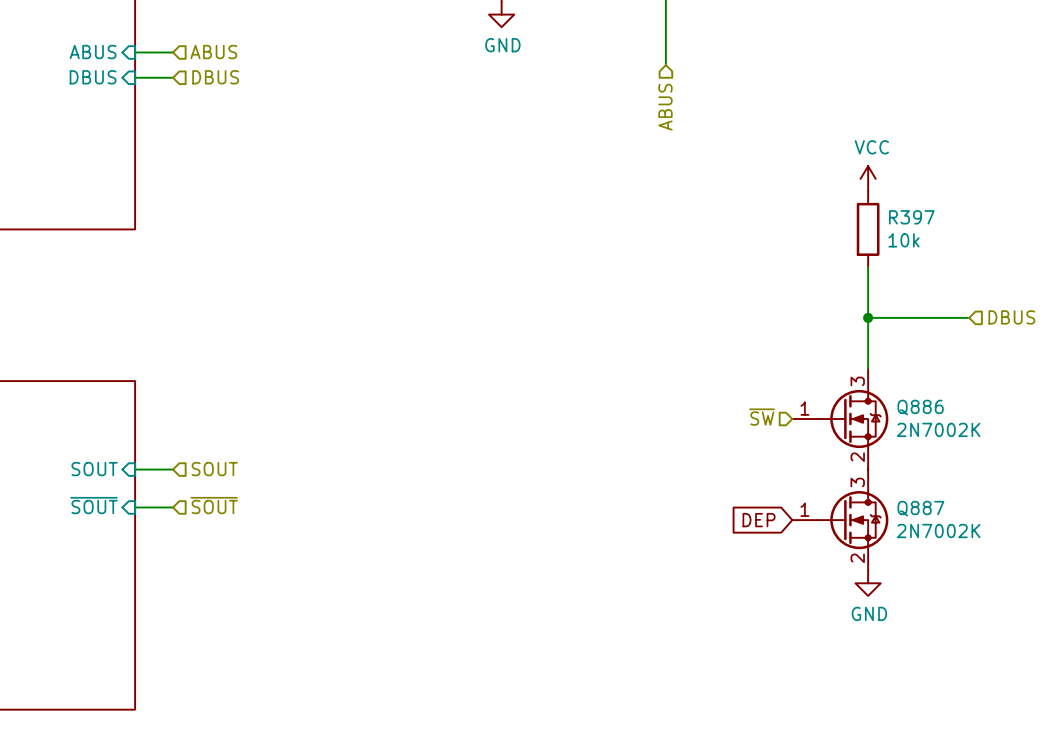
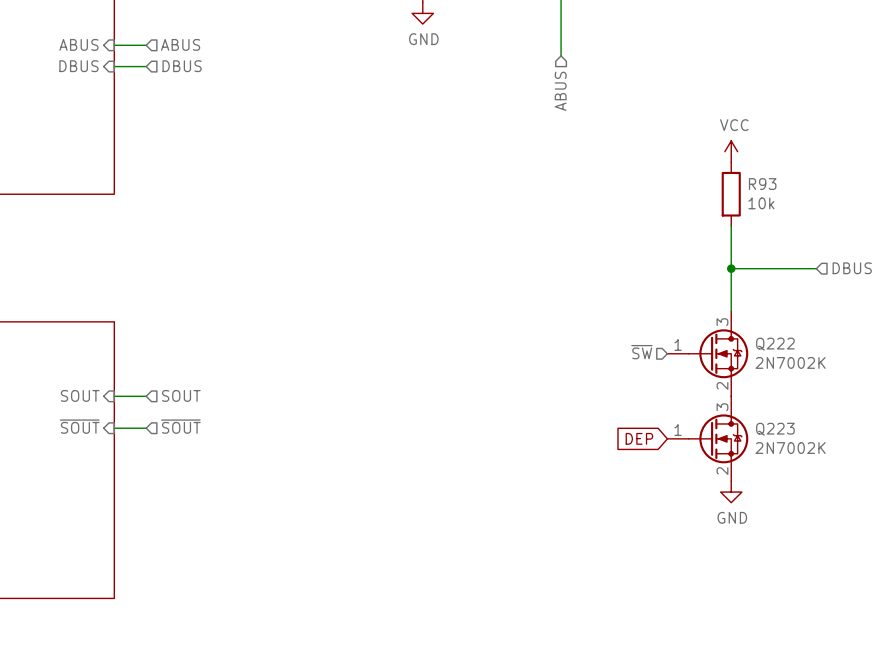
R397 name: R397 (911, 217) -> R93 (762, 184)
Q886 name: Q886 (920, 407) -> Q222 (775, 344)
Q887 name: Q887 (920, 508) -> Q223 (775, 429)

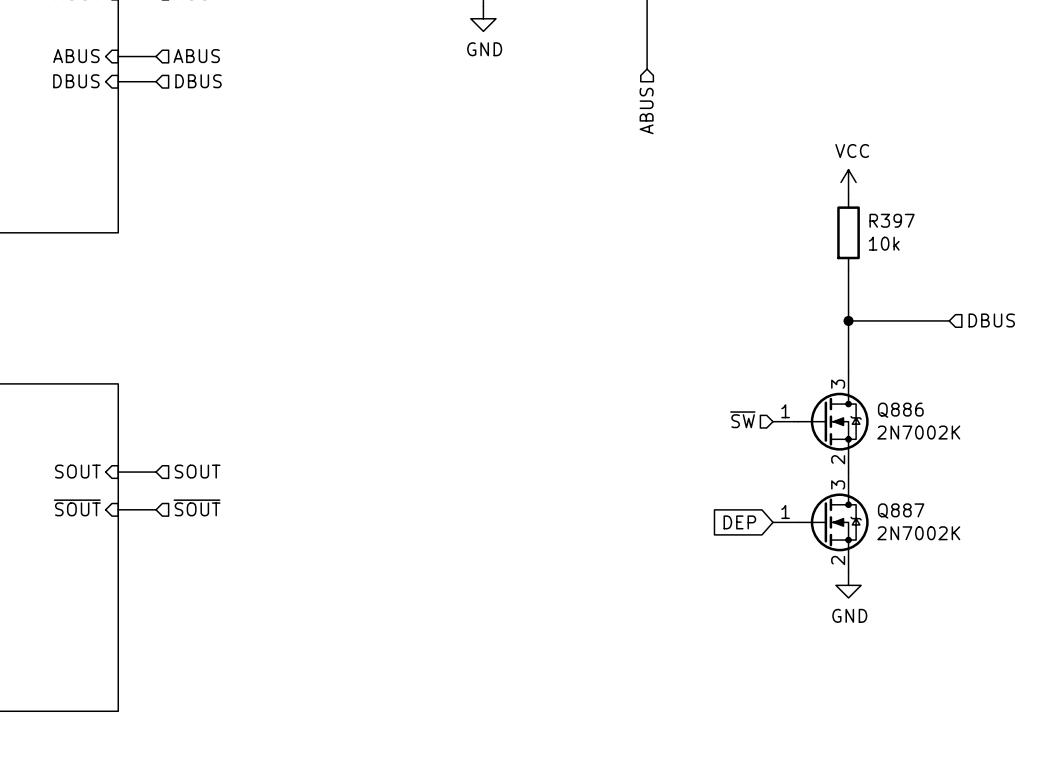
R93 name: R93 (762, 184) -> R397 (892, 220)
Q222 name: Q222 (775, 344) -> Q886 (900, 410)
Q223 name: Q223 (775, 429) -> Q887 (901, 510)

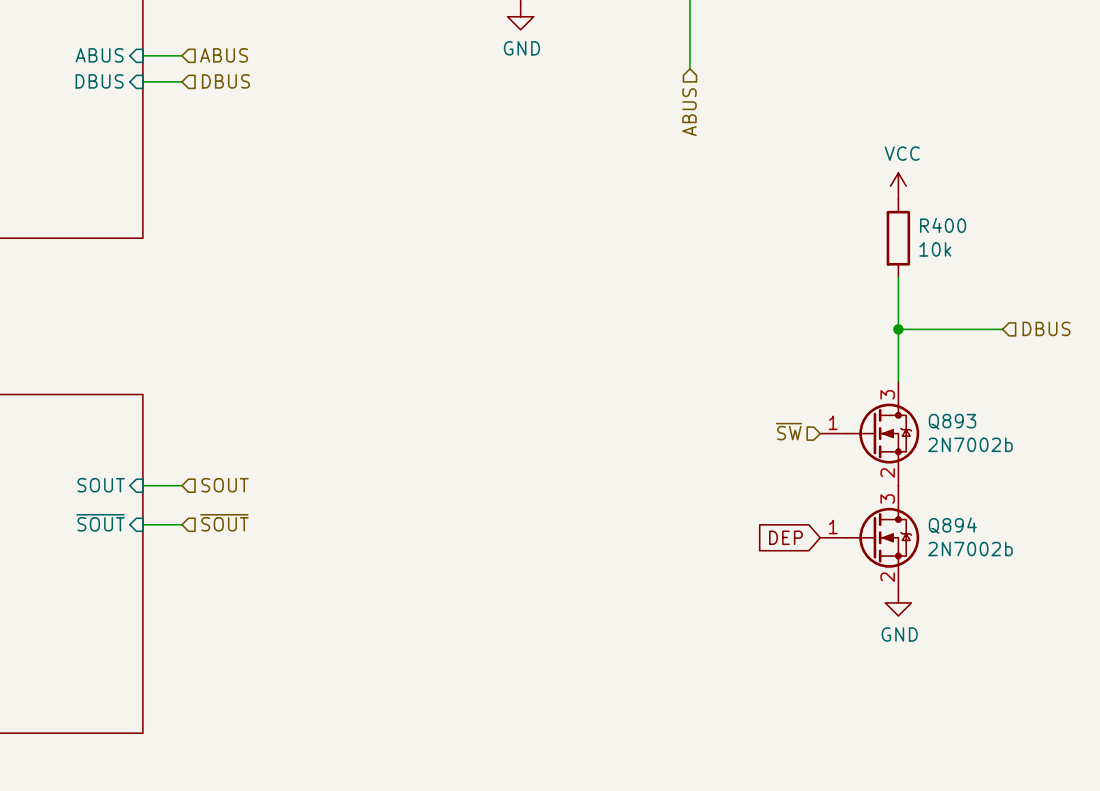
R397 name: R397 (892, 220) -> R400 (943, 225)
Q886 name: Q886 (900, 410) -> Q893 (952, 421)
Q886 value: 2N7002K (918, 432) -> 2N7002b (970, 444)
Q887 name: Q887 (901, 510) -> Q894 (952, 525)
Q887 value: 2N7002K (918, 533) -> 2N7002b (970, 549)

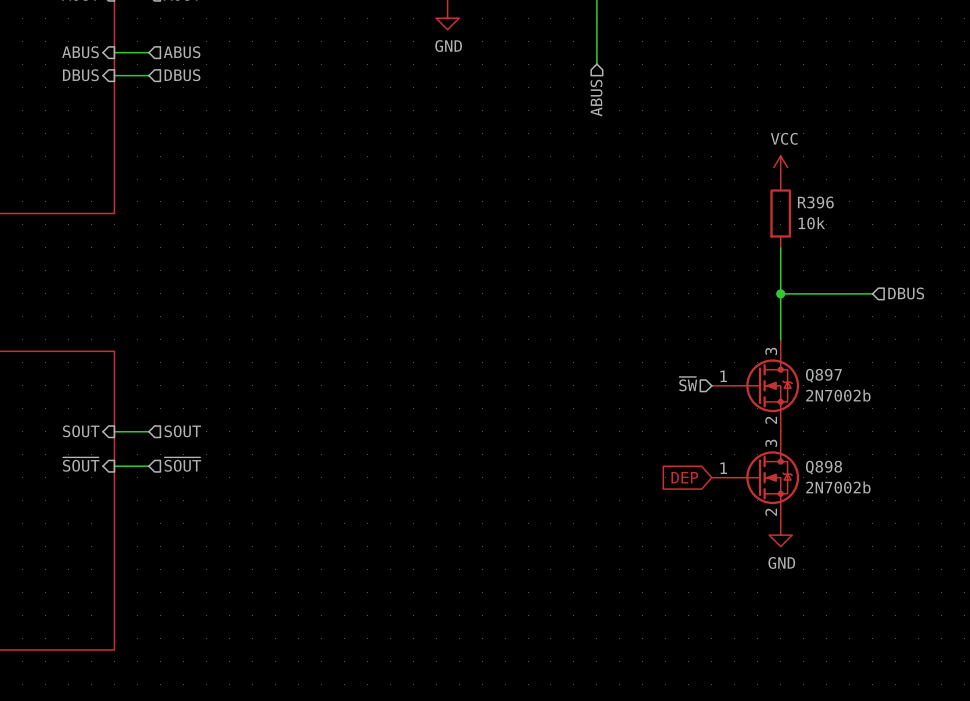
R400 name: R400 (943, 225) -> R396 (815, 202)
Q893 name: Q893 (952, 421) -> Q897 (823, 375)
Q894 name: Q894 (952, 525) -> Q898 (823, 467)

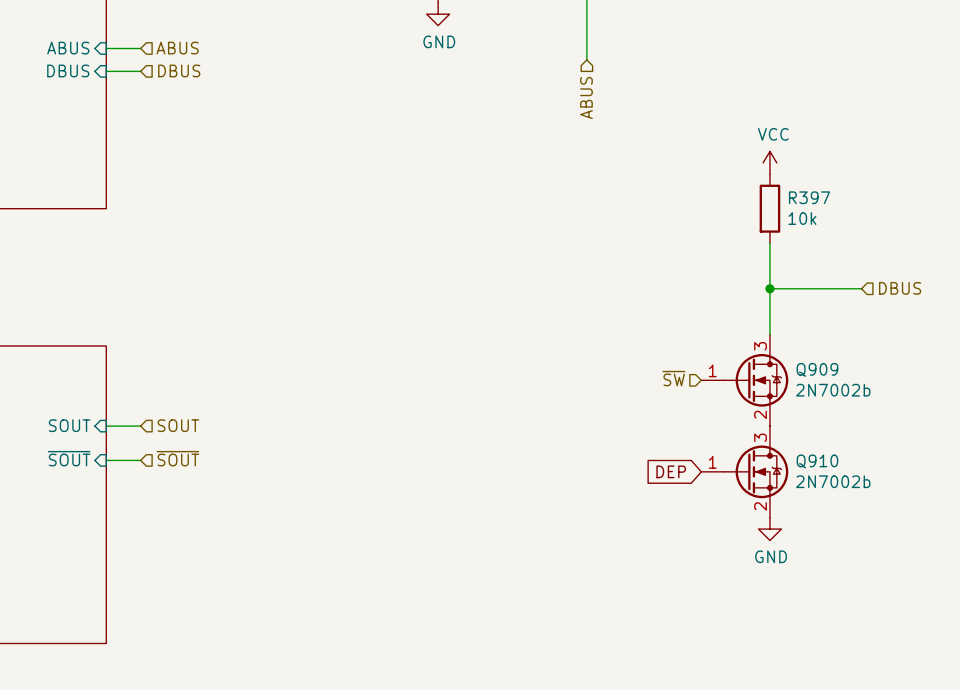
R396 name: R396 (815, 202) -> R397 (809, 197)
Q897 name: Q897 (823, 375) -> Q909 (817, 369)
Q898 name: Q898 (823, 467) -> Q910 (817, 461)

